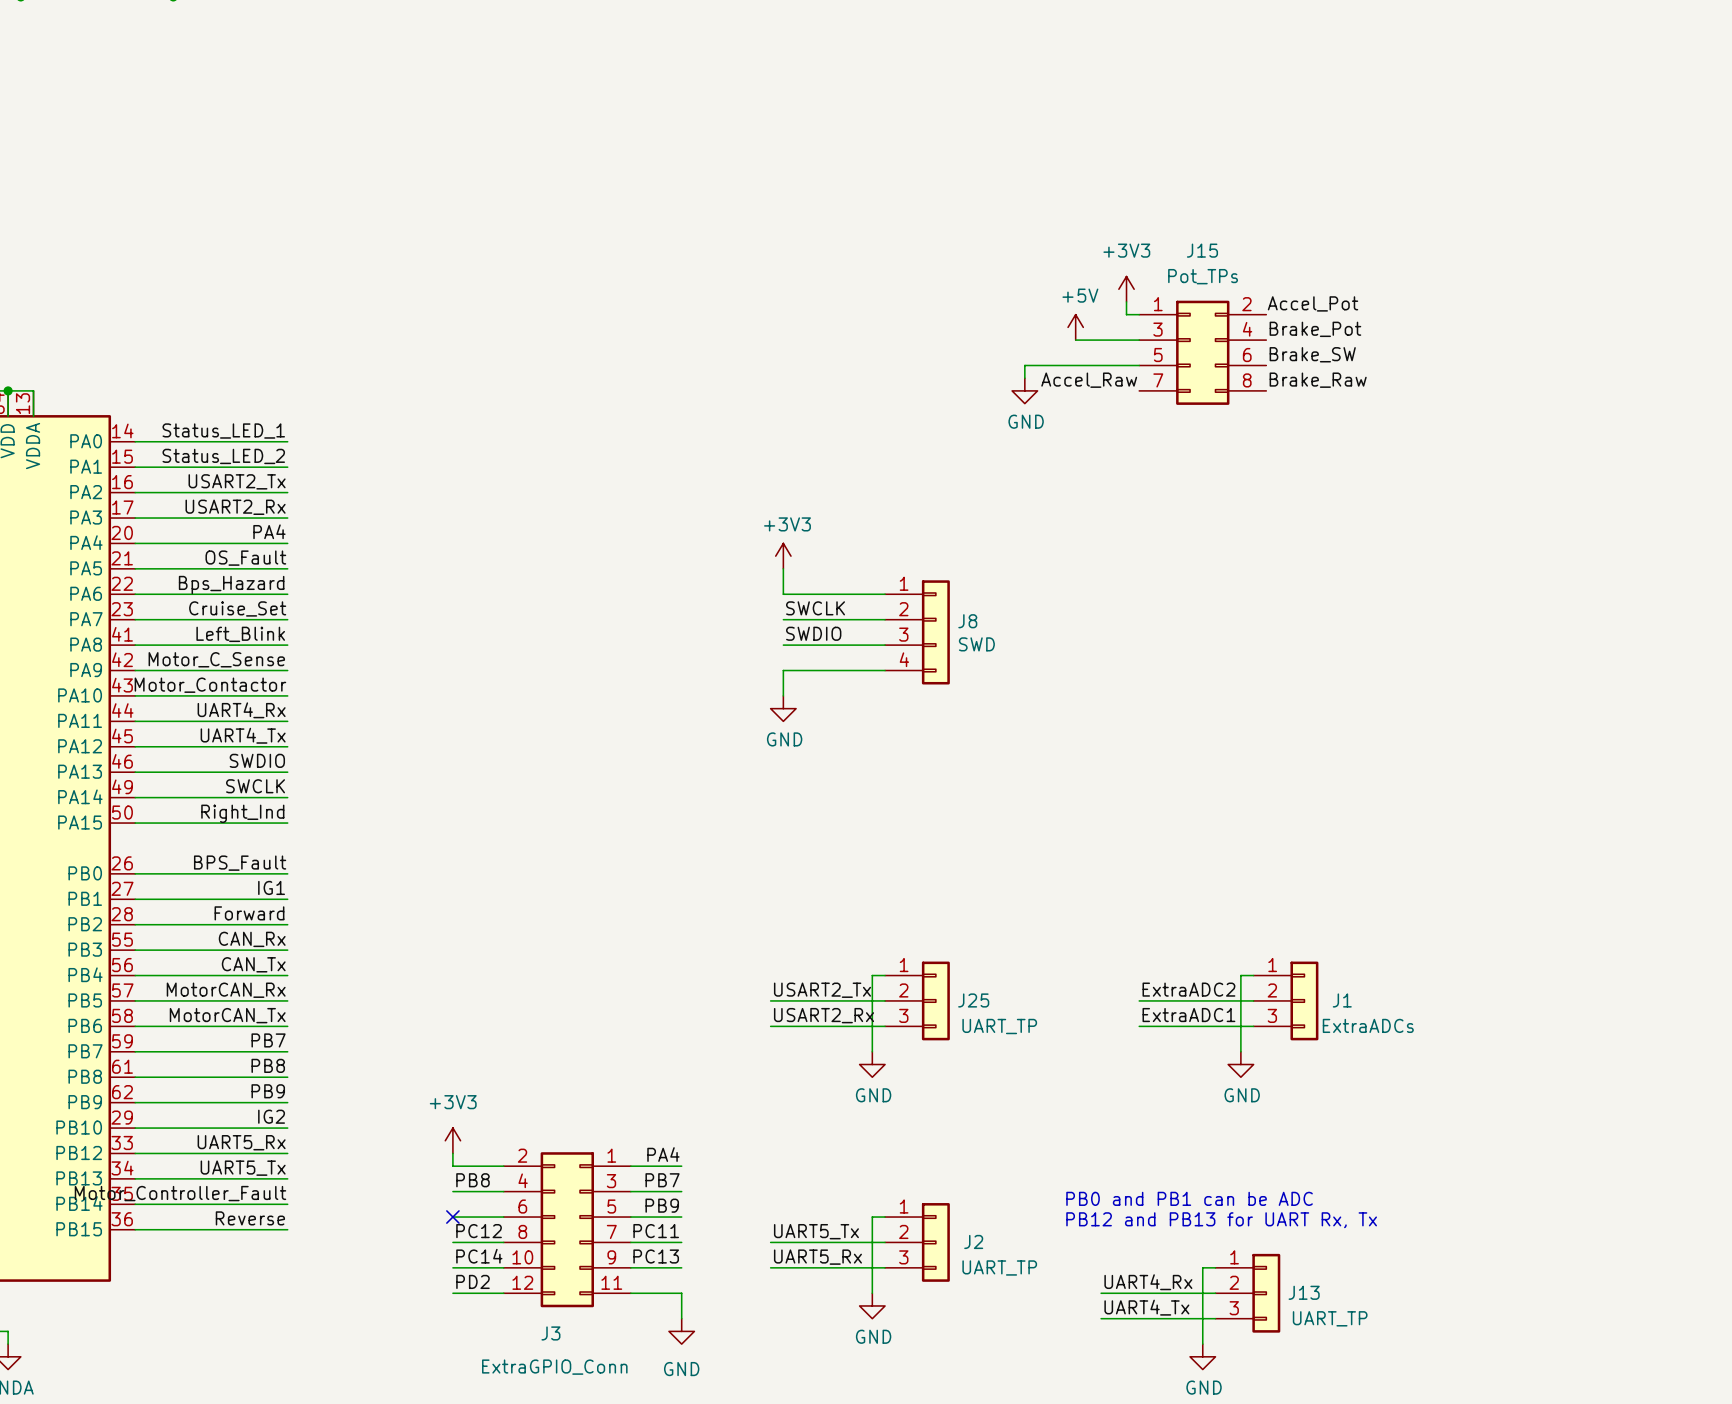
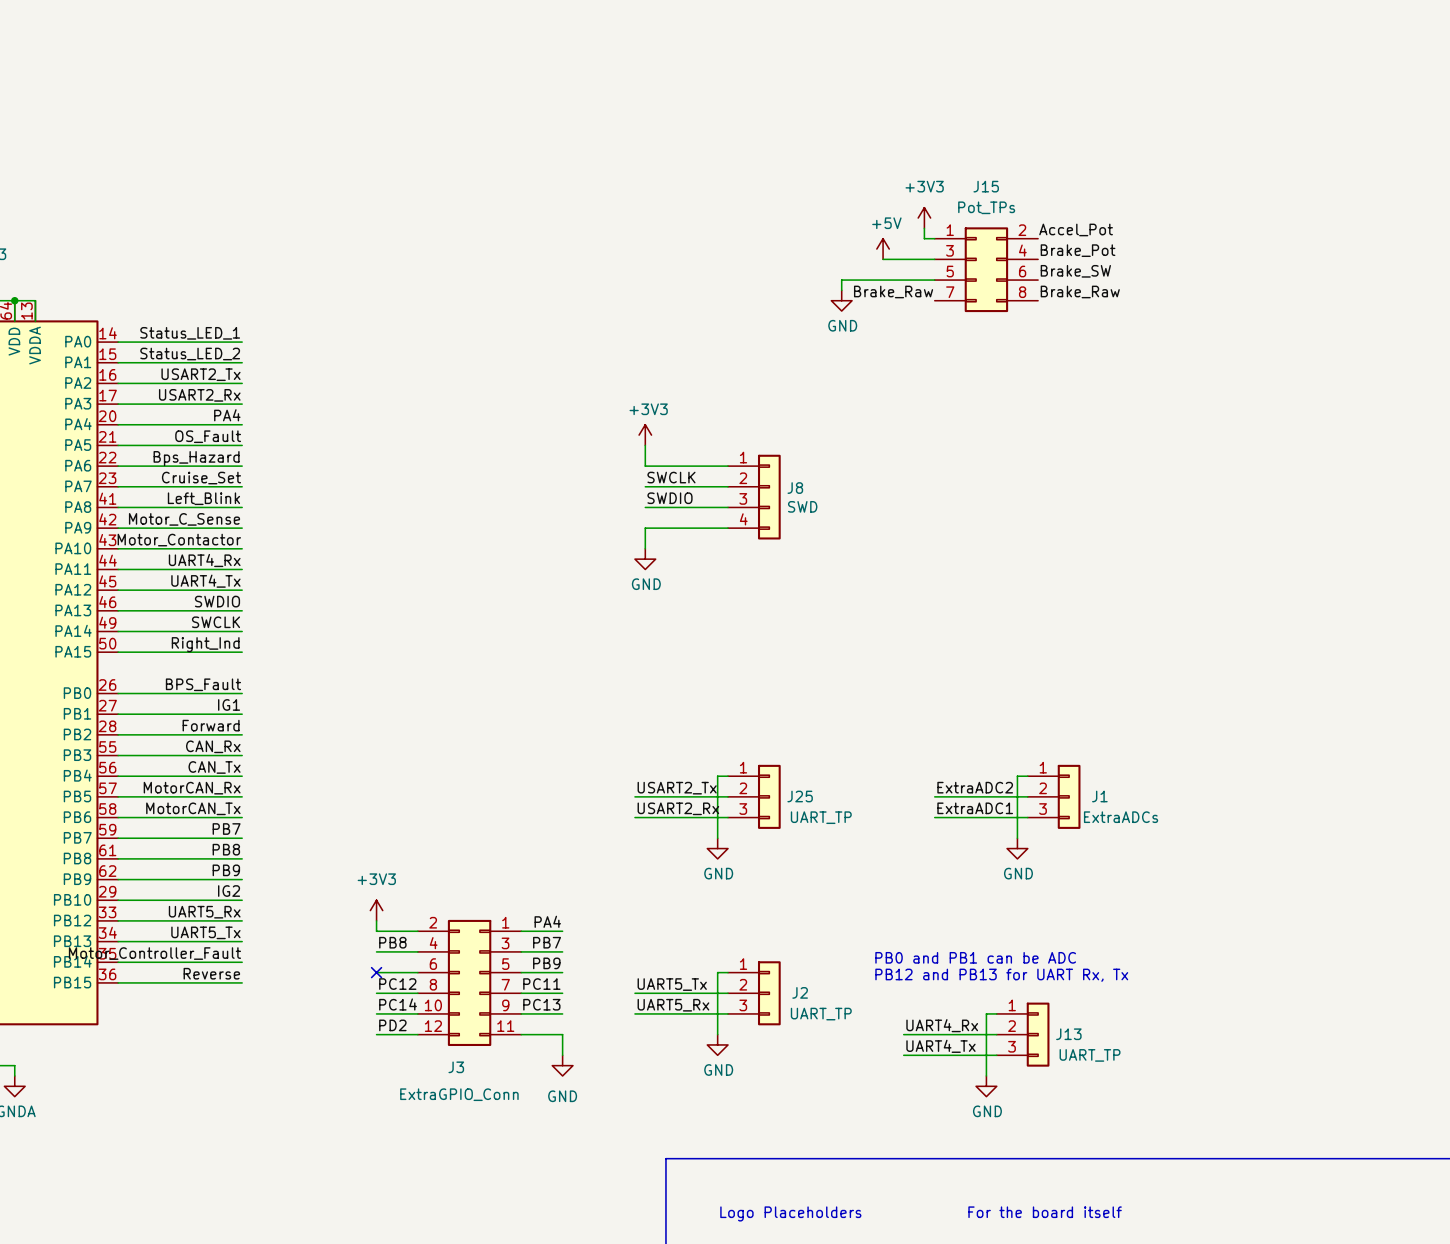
label: Accel_Raw (1089, 380) -> Brake_Raw (893, 291)

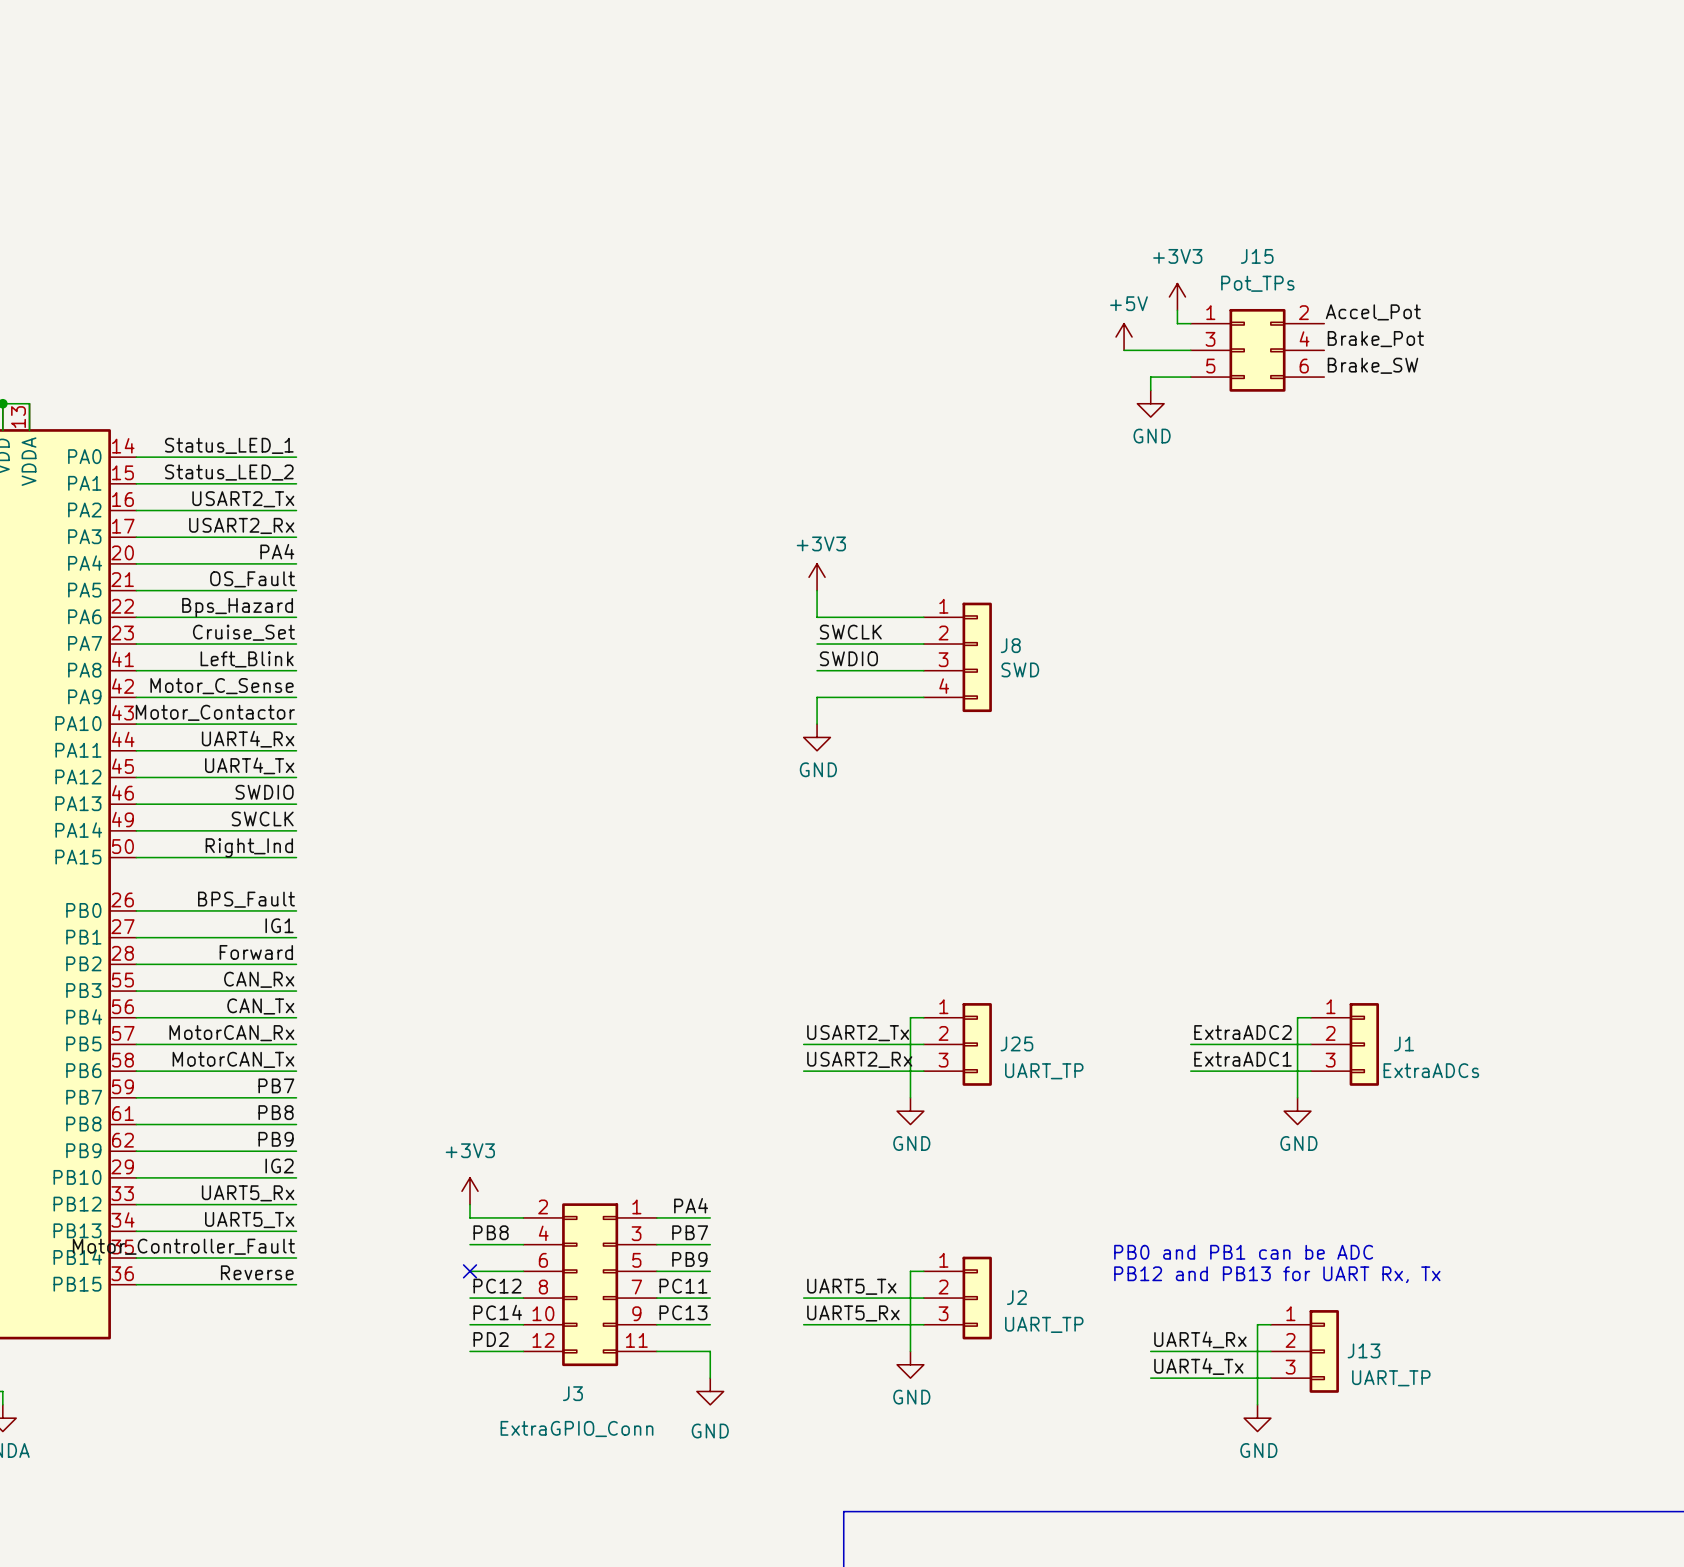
J15 symbol: [934, 227, 1039, 313] -> [1190, 308, 1325, 392]
wire: (903, 280) (841, 280) (841, 290) -> (1150, 377) (1150, 390)
label: Brake_Raw (893, 291) -> none
label: Brake_Raw (1080, 291) -> none
power symbol position: GND (841, 300) -> GND (1150, 403)

